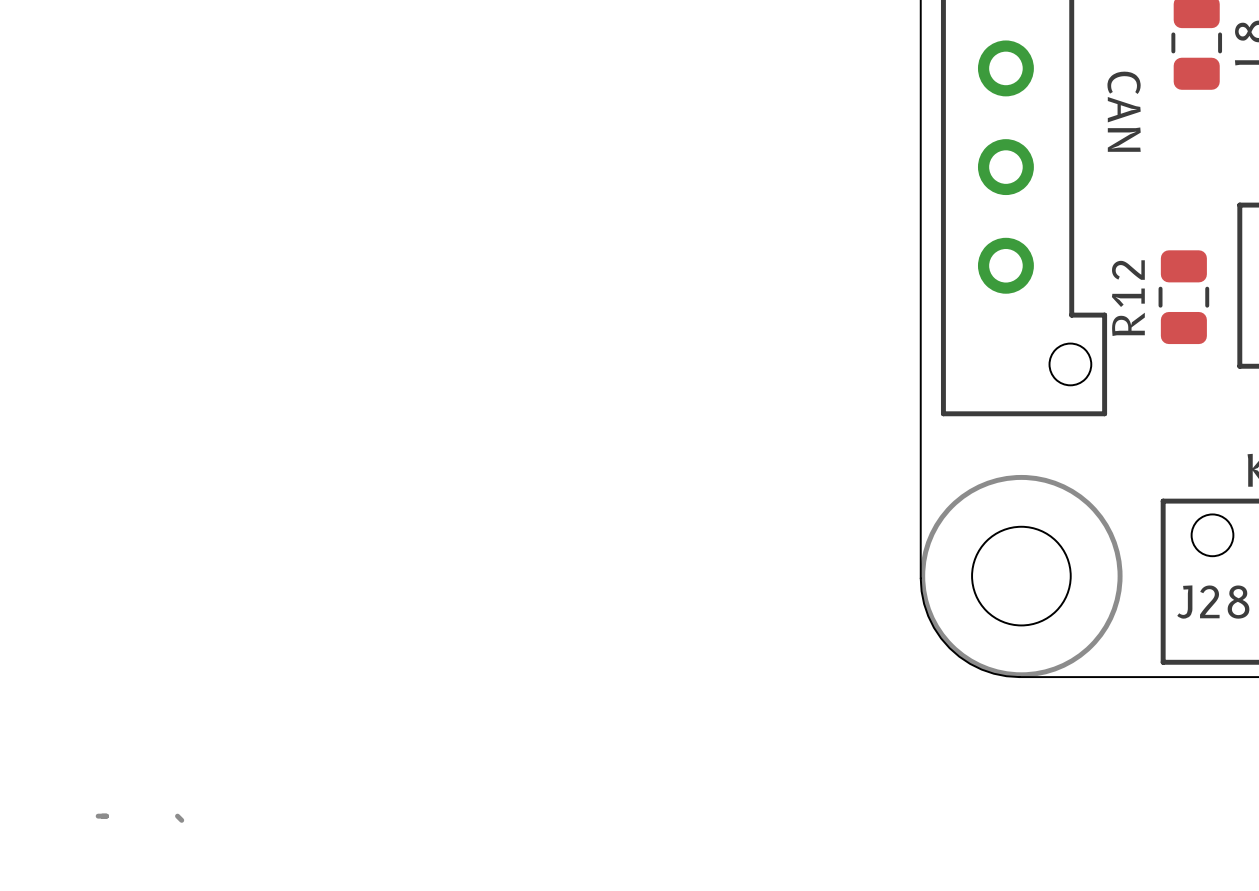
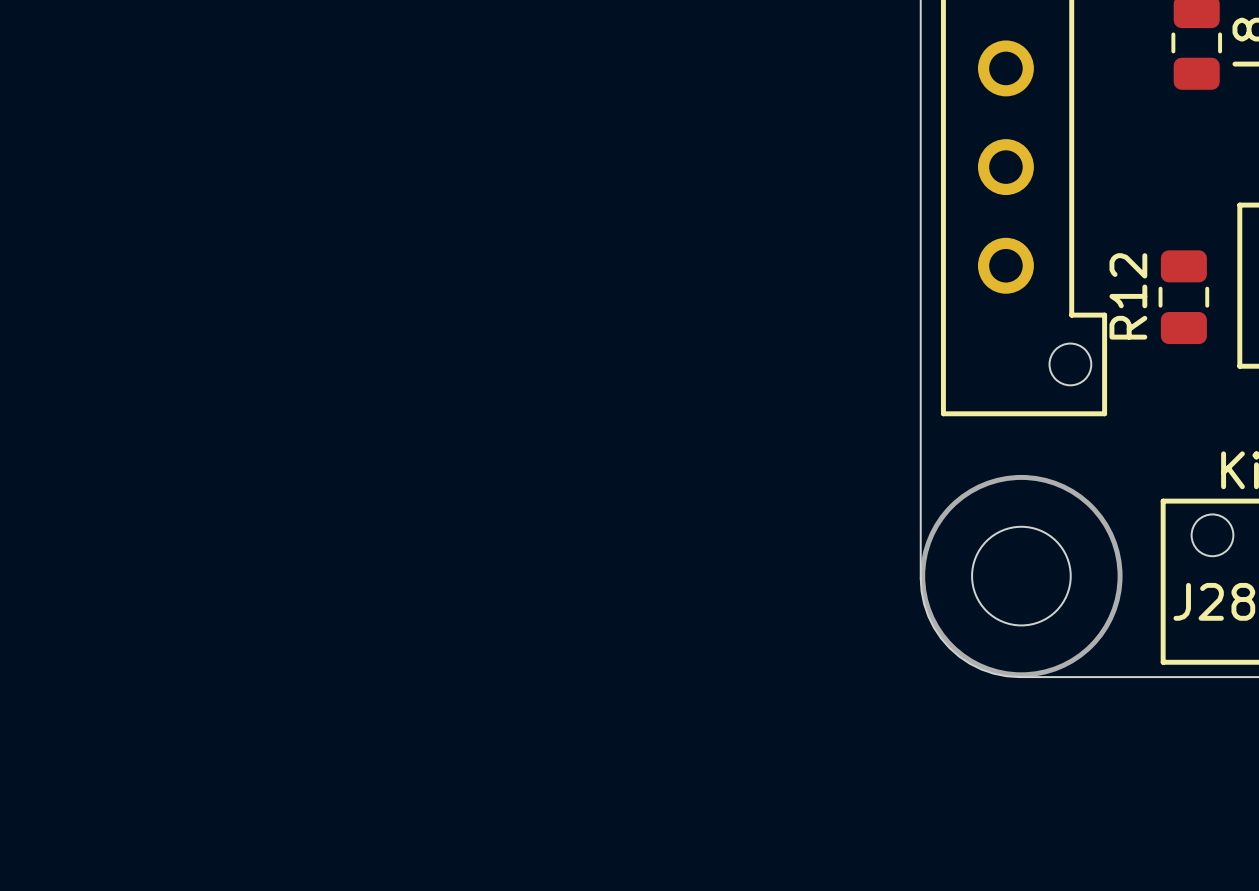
text: CAN (1124, 111) -> none
line: (98, 816) (106, 816) -> none
line: (177, 816) (181, 820) -> none

